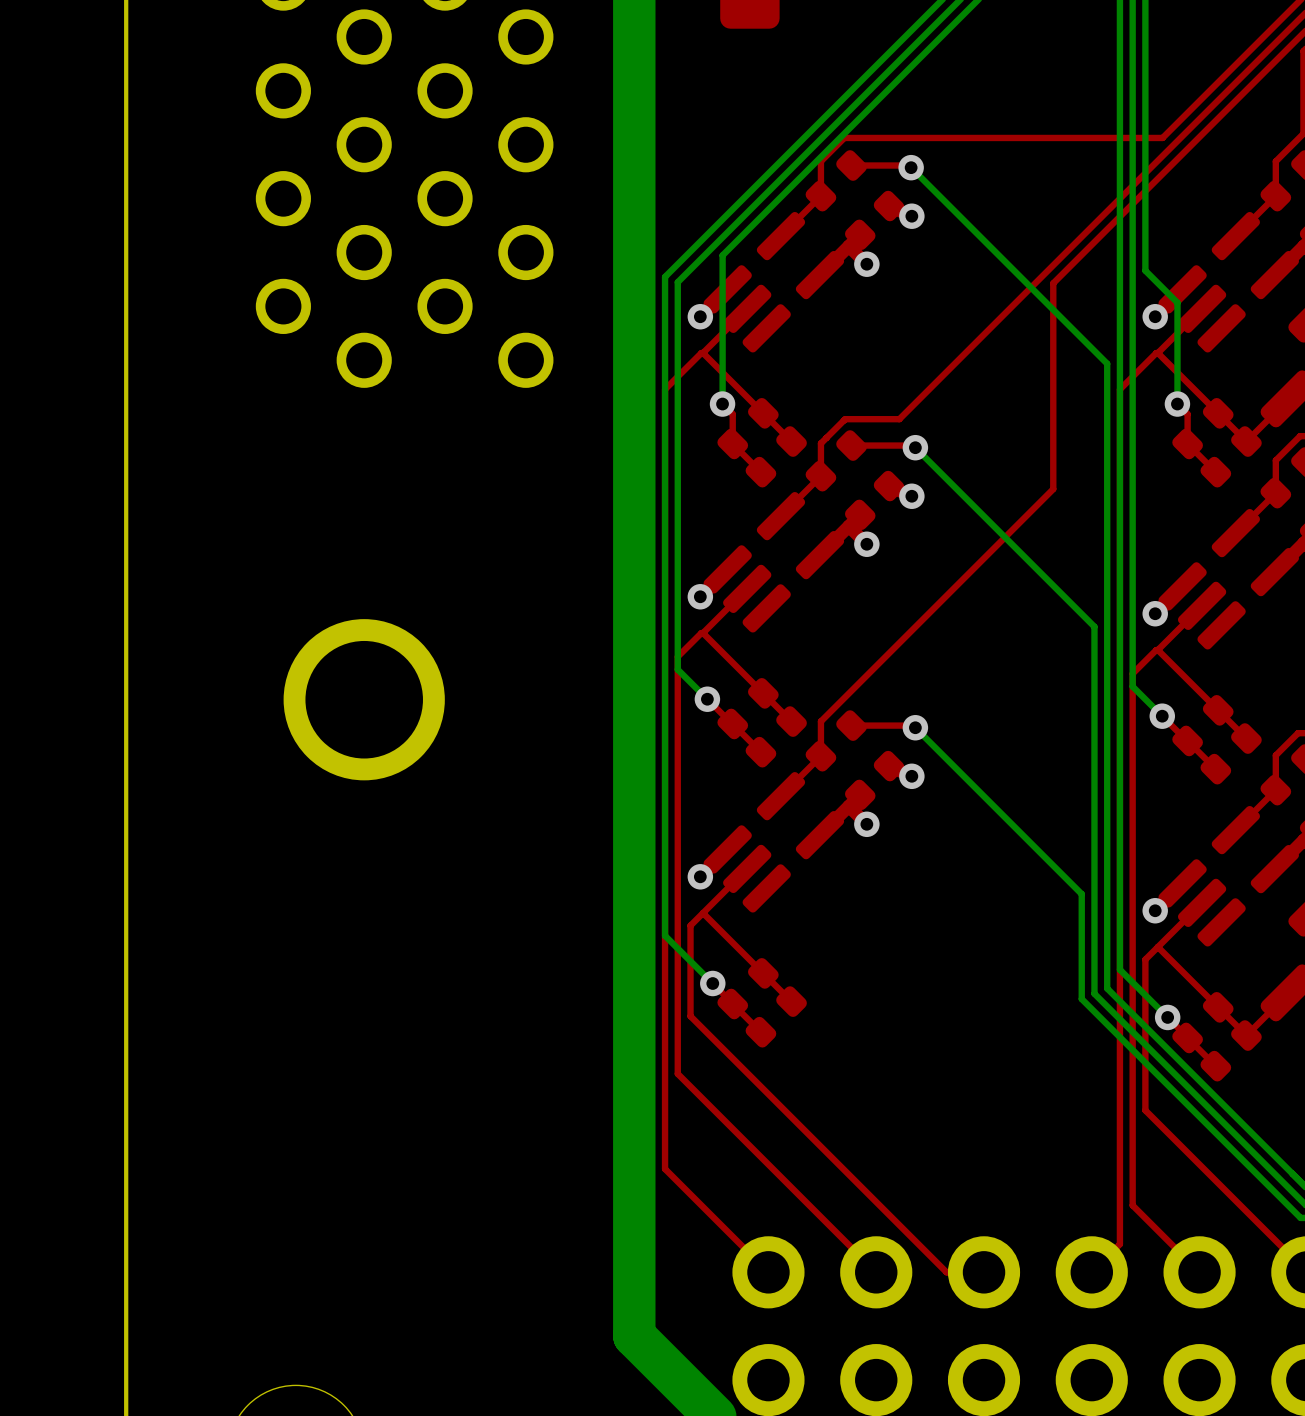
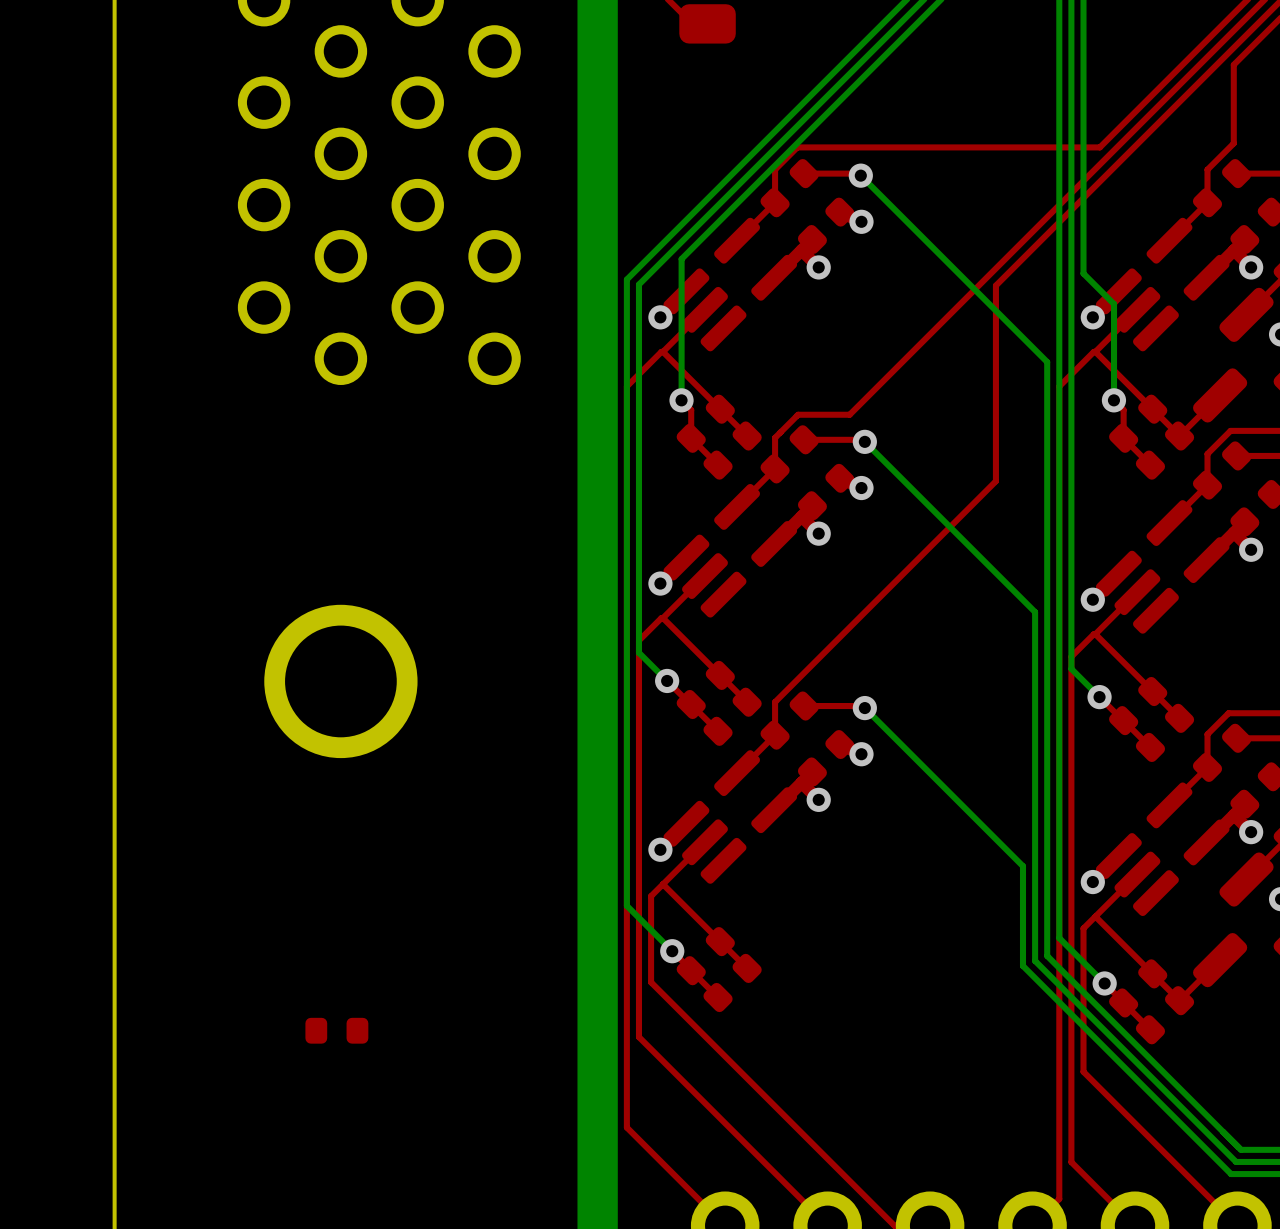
part: none -> (336, 1030)

